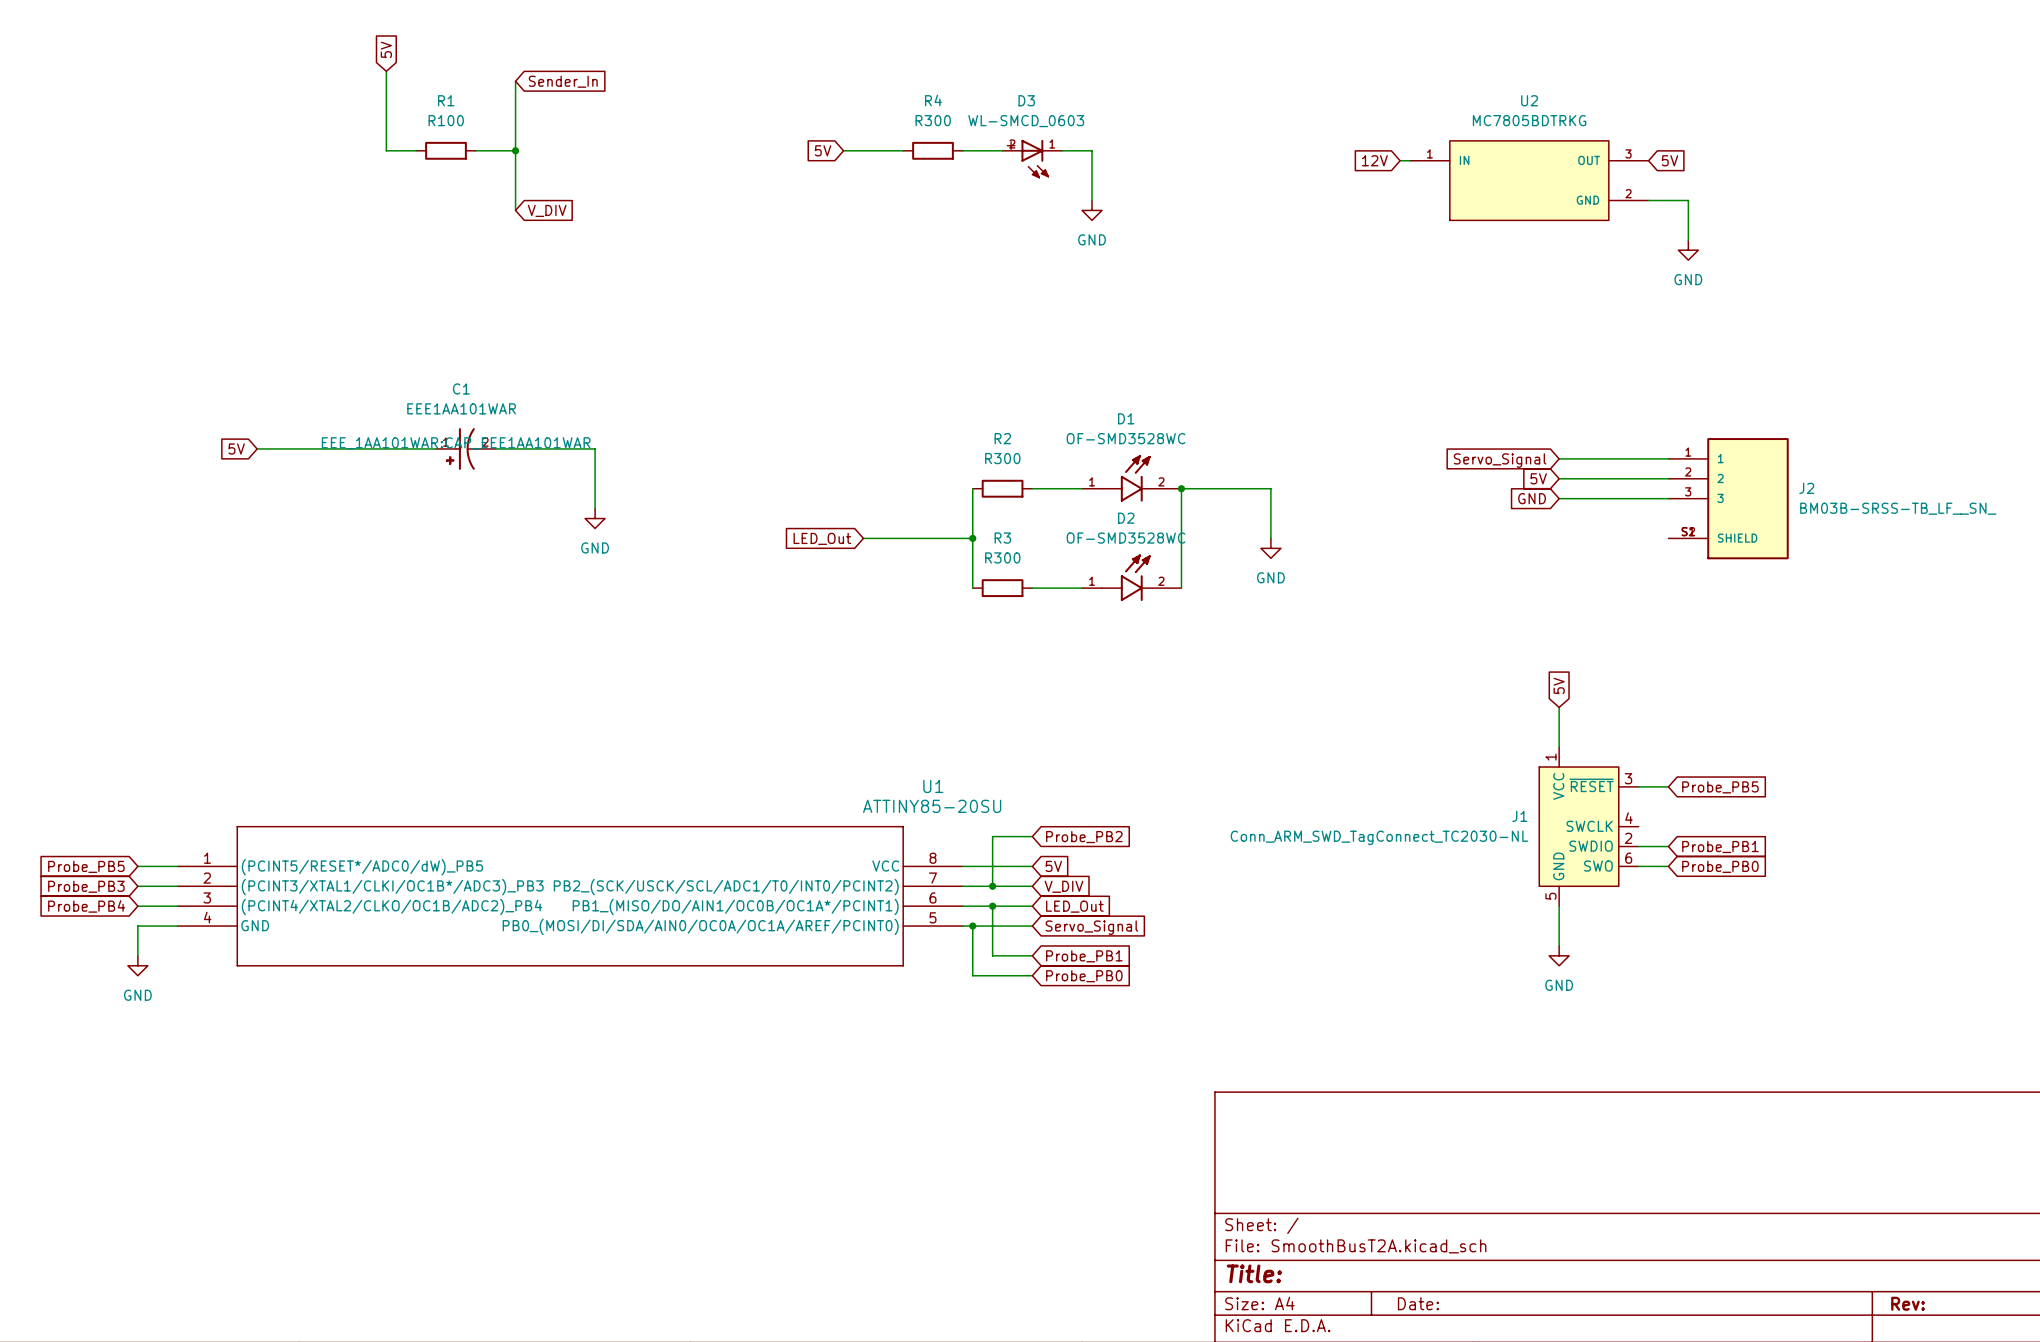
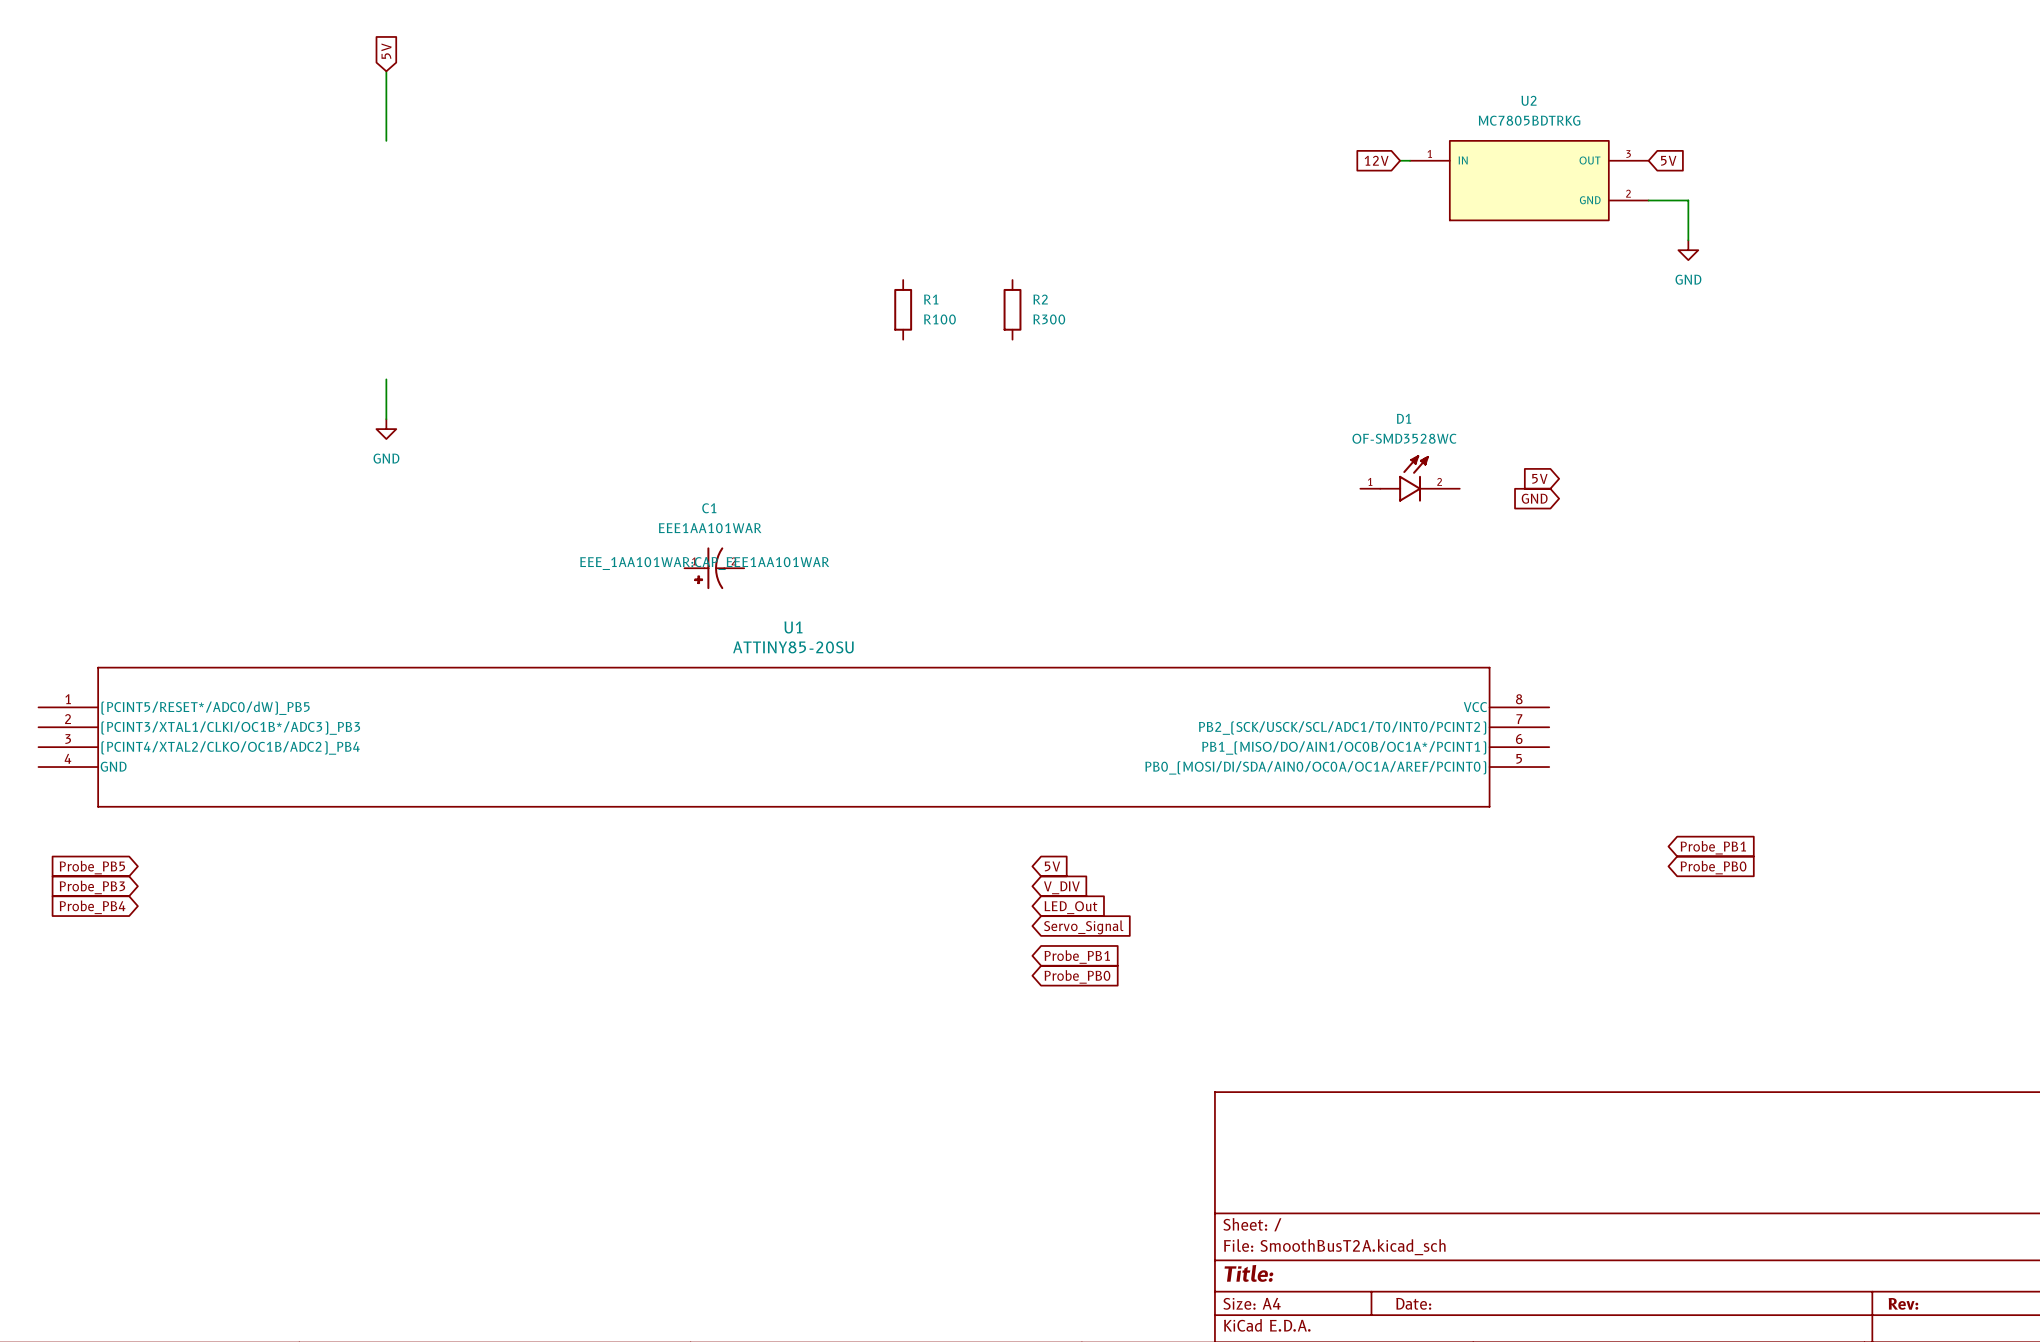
wire: (515, 81) (515, 210) -> none
global label: Sender_In (563, 81) -> none
R1 name position: R1 (446, 100) -> R1 (931, 299)
R1 value position: R100 (446, 120) -> R100 (939, 319)
wire: (386, 140) (386, 150) (416, 150) -> none
R1 rotation: 0° (445, 150) -> 90° clockwise (903, 309)
R1 position: (445, 150) -> (903, 309)
wire: (475, 150) (515, 150) -> none
junction: (515, 150) -> none
global label: 5V (823, 150) -> none
wire: (843, 150) (903, 150) -> none
R4: R300 (933, 150) -> none
wire: (962, 150) (1002, 150) -> none
wire: (1062, 150) (1092, 150) (1092, 200) -> none
D3: WL-SMCD_0603 (1032, 159) -> none
global label: V_DIV (547, 210) -> none
power symbol: GND (1092, 210) -> none
wire: none -> (386, 379) (386, 419)
power symbol: none -> GND (386, 429)
R2 name position: R2 (1002, 438) -> R2 (1040, 299)
global label: 5V (236, 448) -> none
wire: (257, 448) (436, 448) -> none
C1 position: (465, 448) -> (714, 568)
wire: (495, 448) (595, 448) (595, 508) -> none
R2 value position: R300 (1002, 458) -> R300 (1049, 319)
wire: (1559, 458) (1668, 458) -> none
global label: Servo_Signal (1500, 460) -> none
D1 position: (1131, 478) -> (1410, 478)
wire: (1559, 478) (1668, 478) -> none
wire: (972, 488) (972, 588) -> none
R2 rotation: 0° (1002, 488) -> 90° clockwise (1012, 309)
R2 position: (1002, 488) -> (1012, 309)
wire: (1032, 488) (1082, 488) -> none
junction: (1181, 488) -> none
wire: (1559, 498) (1668, 498) -> none
J2: BM03B-SRSS-TB_LF__SN_ (1728, 498) -> none
power symbol: GND (595, 518) -> none
global label: LED_Out (822, 538) -> none
wire: (863, 538) (972, 538) -> none
junction: (972, 538) -> none
wire: (1270, 538) (1270, 488) (1181, 488) (1181, 588) -> none
power symbol: GND (1270, 548) -> none
D2: OF-SMD3528WC (1131, 577) -> none
R3: R300 (1002, 588) -> none
wire: (1032, 588) (1082, 588) -> none
global label: 5V (1559, 685) -> none
wire: (1559, 707) (1559, 747) -> none
U1 name position: U1 (933, 786) -> U1 (793, 627)
wire: (1638, 786) (1668, 786) -> none
global label: Probe_PB5 (1720, 787) -> none
U1 value position: ATTINY85-20SU (932, 806) -> ATTINY85-20SU (793, 647)
U1 symbol: [177, 826, 963, 967] -> [38, 667, 1550, 808]
J1: Conn_ARM_SWD_TagConnect_TC2030-NL (1588, 826) -> none
wire: (1032, 836) (992, 836) (992, 886) -> none
global label: Probe_PB2 (1084, 837) -> none
wire: (1638, 846) (1668, 846) -> none
wire: (137, 866) (177, 866) -> none
wire: (962, 866) (1032, 866) -> none
wire: (1638, 866) (1668, 866) -> none
wire: (137, 886) (177, 886) -> none
wire: (962, 886) (1032, 886) -> none
junction: (992, 886) -> none
wire: (137, 906) (177, 906) -> none
wire: (962, 906) (1032, 906) -> none
wire: (992, 906) (992, 955) (1032, 955) -> none
junction: (992, 906) -> none
wire: (1559, 906) (1559, 945) -> none
wire: (177, 926) (137, 926) (137, 955) -> none
wire: (962, 926) (1032, 926) -> none
wire: (972, 926) (972, 975) (1032, 975) -> none
junction: (972, 926) -> none
power symbol: GND (1559, 955) -> none
power symbol: GND (137, 965) -> none

